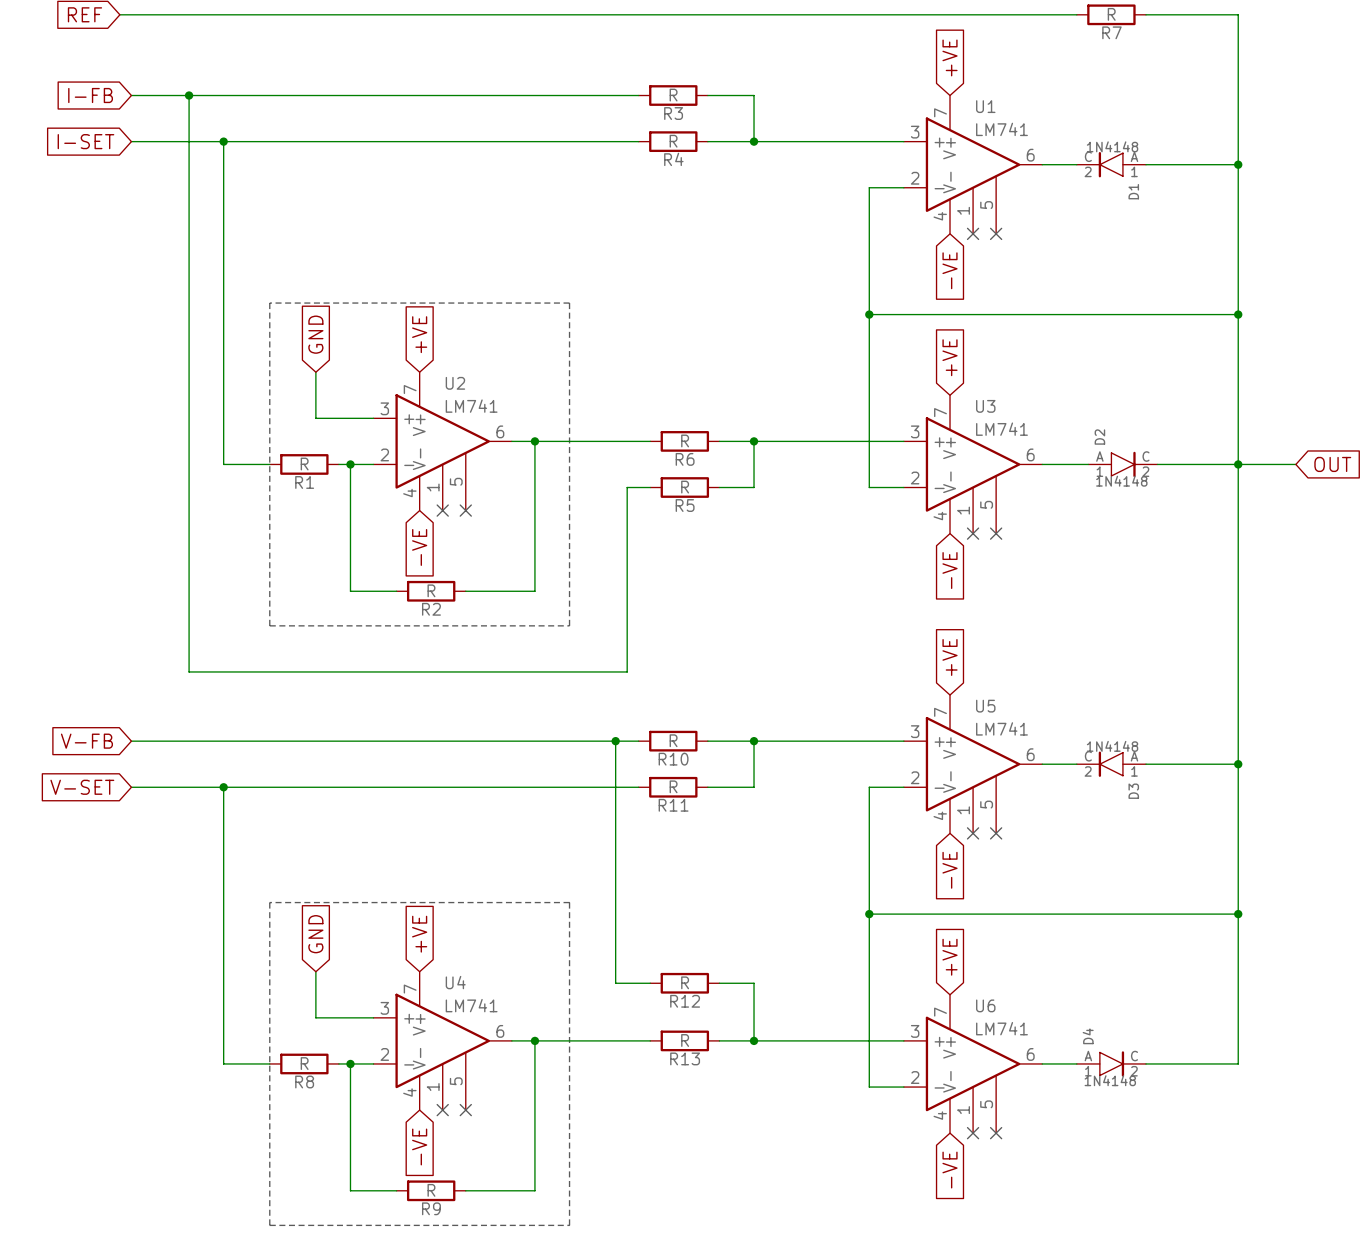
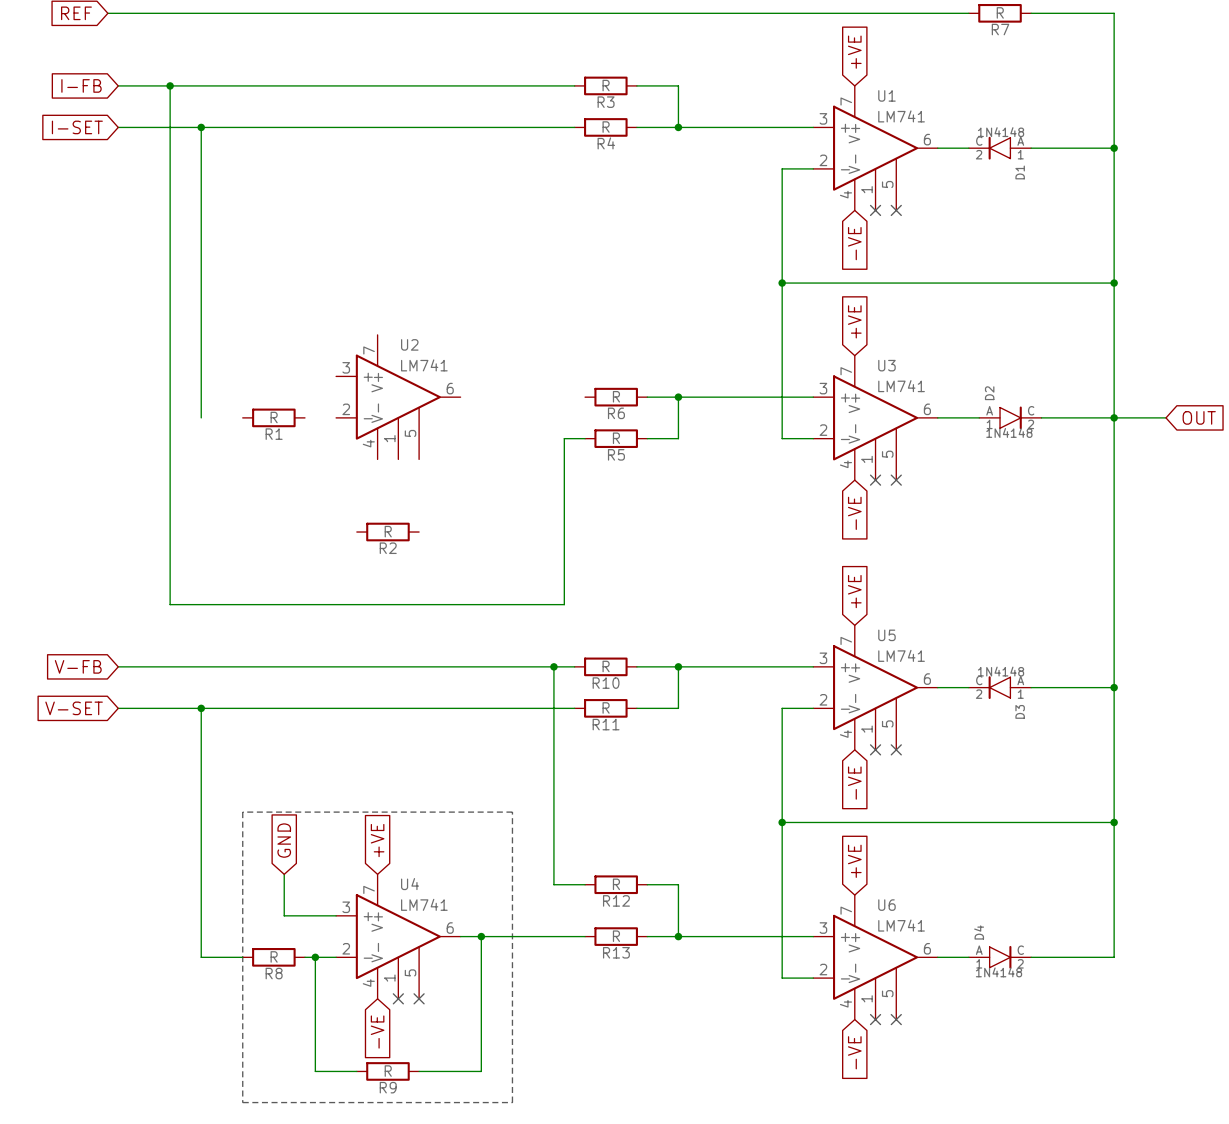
line: (269, 303) (269, 625) (569, 625) (569, 303) (269, 303) -> none
global label: GND (315, 334) -> none
global label: +VE (419, 334) -> none
wire: (315, 372) (315, 418) (373, 418) -> none
wire: (511, 441) (650, 441) -> none
wire: (534, 441) (534, 591) (465, 591) -> none
junction: (534, 441) -> none
wire: (223, 464) (269, 464) -> none
wire: (338, 464) (373, 464) -> none
wire: (350, 464) (350, 591) (396, 591) -> none
junction: (350, 464) -> none
no-connect mark: (442, 510) -> none
no-connect mark: (465, 510) -> none
global label: -VE (419, 547) -> none

